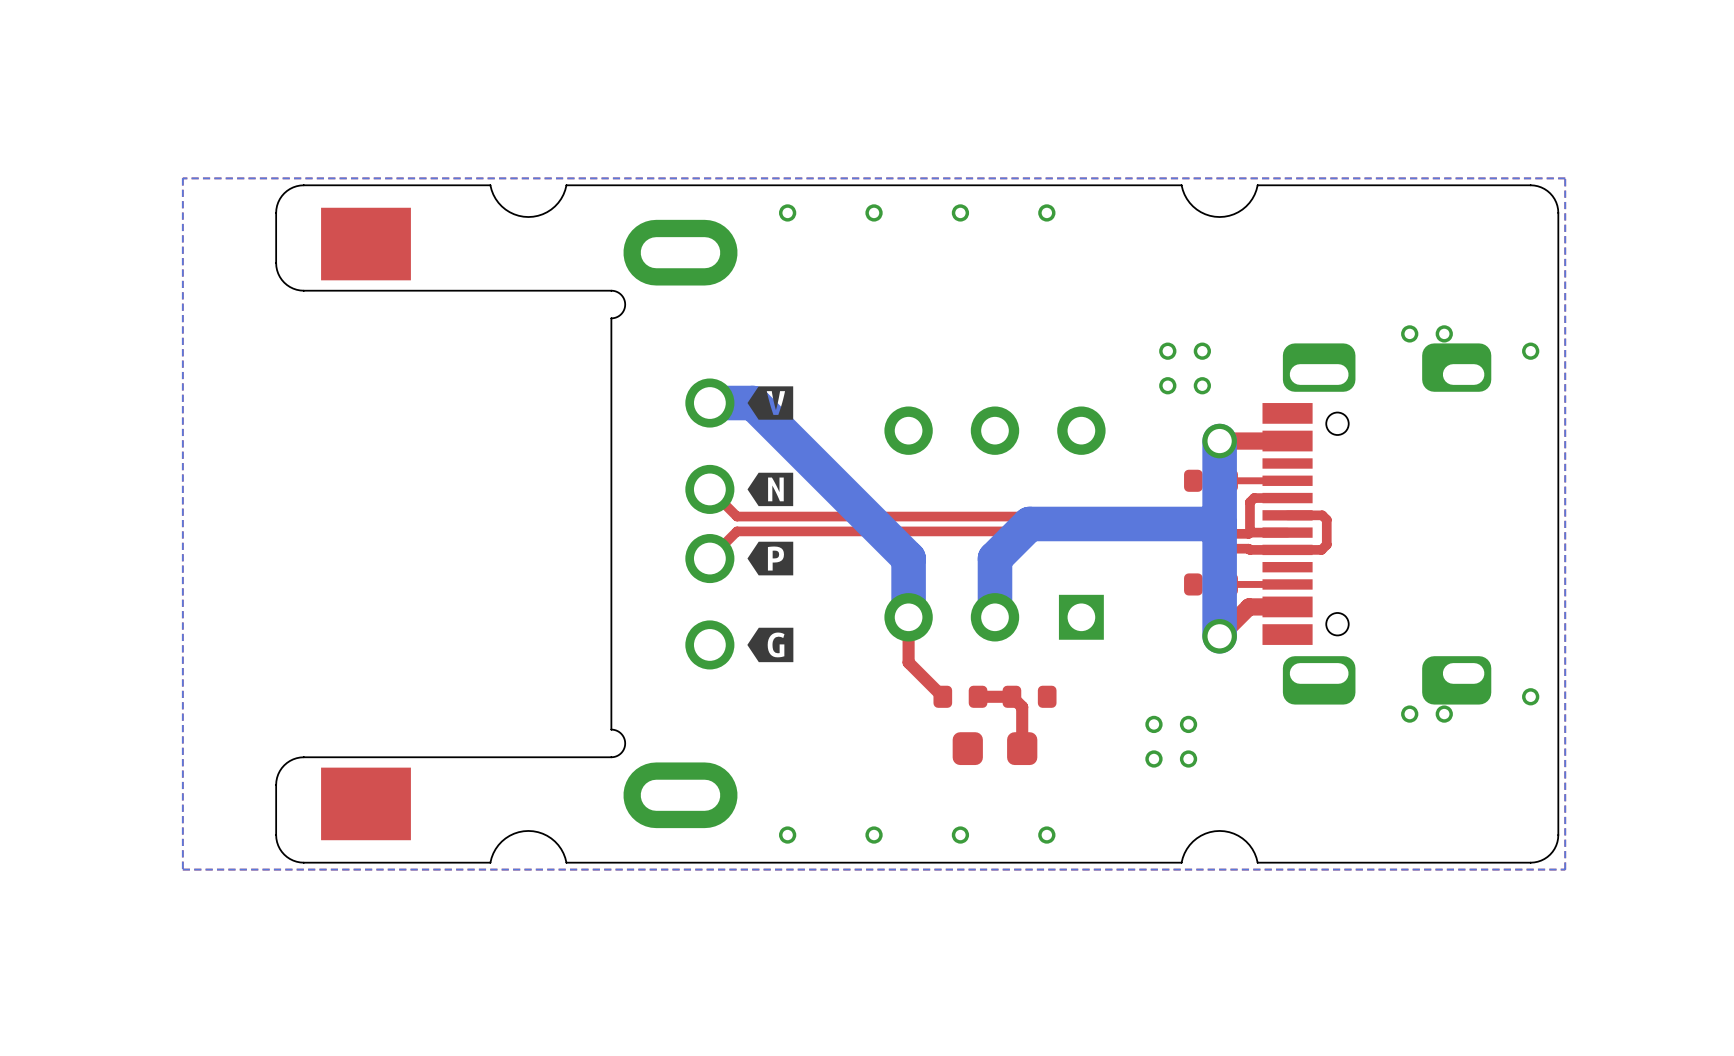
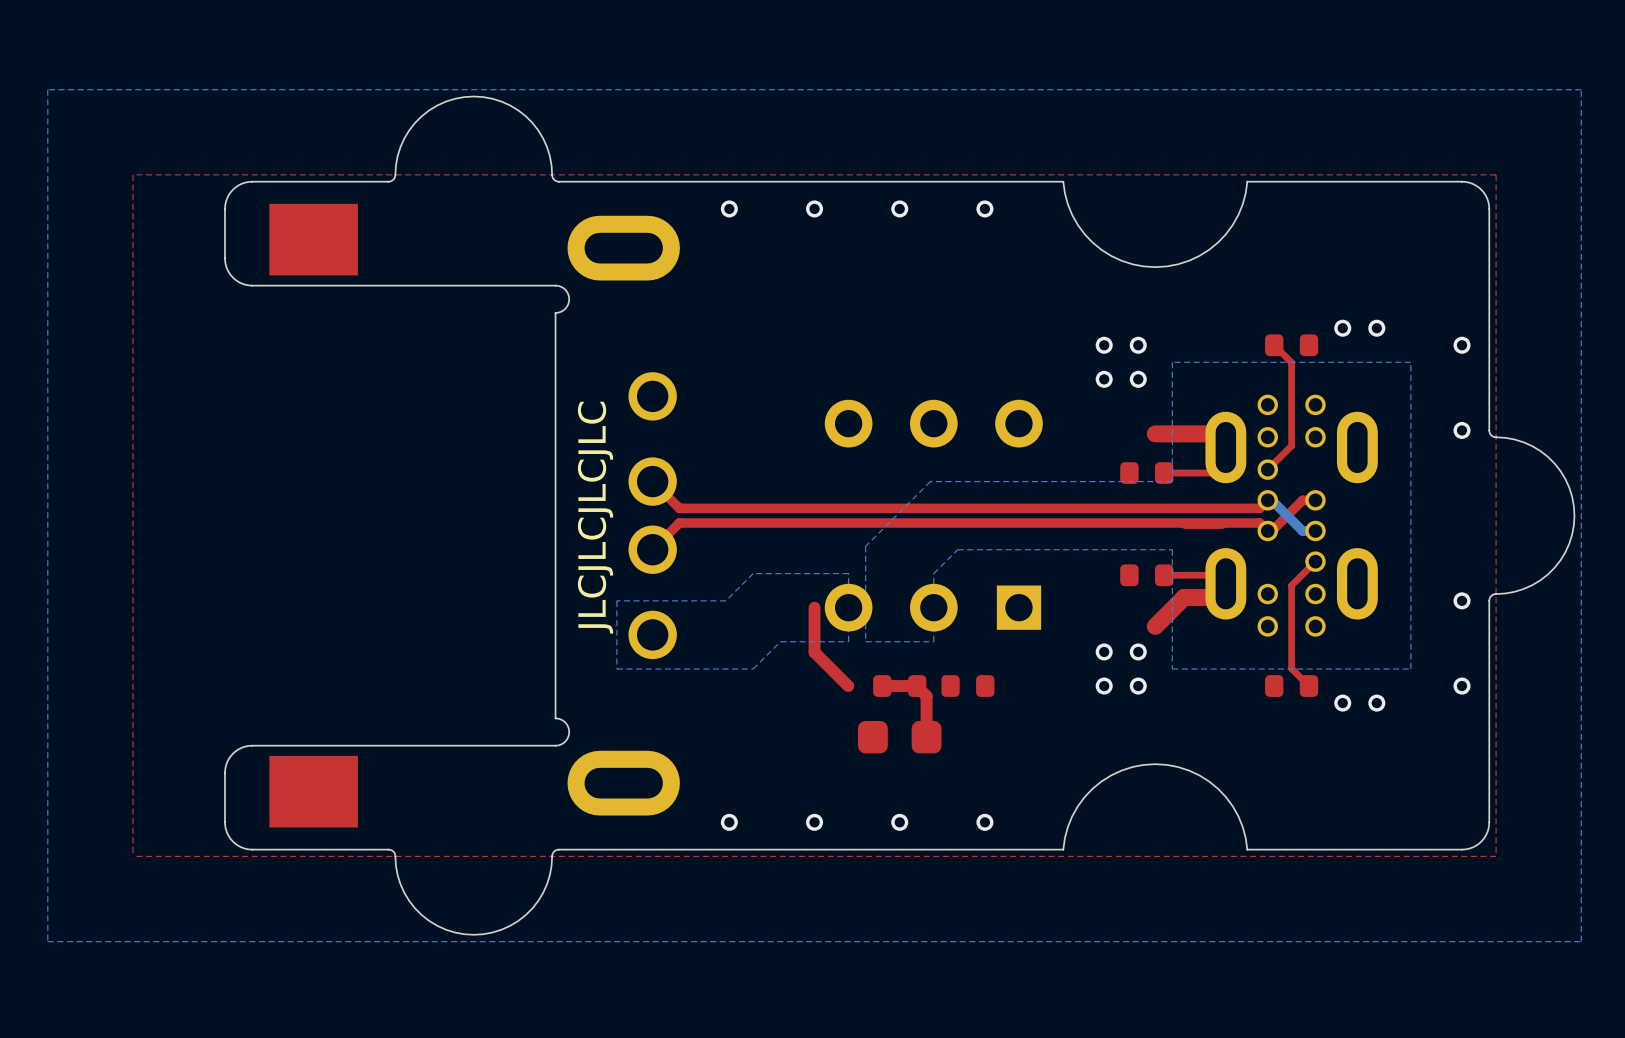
bottom zone outline: (1565, 178) (1565, 869) (182, 869) (182, 178) (1565, 178) -> (1581, 89) (1581, 941) (47, 941) (47, 89) (1581, 89)
board edge: (614, 185) (566, 185) (561, 198) (551, 209) (538, 215) (528, 217) (514, 214) (501, 206) (495, 198) (490, 185) (442, 185) -> (558, 181) (552, 177) (547, 147) (532, 122) (510, 105) (492, 98) (473, 96) (455, 98) (437, 105) (415, 122) (400, 147) (394, 177) (388, 181)
board edge: (1312, 185) (1257, 185) (1252, 198) (1242, 209) (1229, 215) (1219, 217) (1205, 214) (1193, 206) (1184, 194) (1181, 185) (1126, 185) -> (1247, 181) (1238, 214) (1218, 242) (1189, 260) (1155, 267) (1121, 260) (1092, 242) (1072, 214) (1063, 181)
part footprint: [1262, 343, 1492, 705] -> [1205, 394, 1378, 637]
top track: none -> (1274, 345) (1291, 362) (1291, 445) (1267, 469)
part: none -> (1291, 345)
bottom zone outline: none -> (1410, 362) (1410, 669) (1172, 669) (1172, 549) (957, 549) (933, 573) (933, 641) (865, 641) (865, 546) (930, 481) (1172, 481) (1172, 362) (1410, 362)
drawing: [747, 386, 794, 420] -> none
bottom track: (709, 403) (753, 403) (908, 558) (908, 617) -> none
via: none -> (1462, 430)
board edge: (1558, 437) (1558, 610) -> (1489, 430) (1493, 436) (1514, 439) (1532, 446) (1554, 463) (1569, 487) (1574, 515) (1569, 543) (1554, 567) (1532, 585) (1514, 591) (1493, 594) (1489, 600)
bottom track: (1219, 441) (1219, 636) -> none
via: (1219, 441) -> none
drawing: [747, 472, 794, 576] -> none
top track: (1287, 498) (1254, 498) (1249, 502) (1248, 533) (1222, 533) (1205, 516) -> (1267, 500) (1259, 508) (1141, 508)
bottom track: none -> (1267, 500) (1271, 500) (1302, 530) (1315, 530)
top track: (1287, 515) (1322, 515) (1326, 519) (1326, 544) (1321, 549) (1216, 548) (1199, 531) -> (1315, 500) (1302, 500) (1271, 530) (1267, 530) (1259, 522) (1135, 522)
bottom track: (1219, 523) (1029, 523) (994, 558) (994, 617) -> none
text: none -> JLCJLCJLCJLC (595, 517)
top track: none -> (1315, 561) (1291, 585) (1291, 668) (1309, 686)
bottom zone outline: none -> (848, 573) (848, 641) (780, 641) (753, 669) (616, 669) (616, 600) (725, 600) (753, 573) (848, 573)
via: none -> (1462, 600)
top track: none -> (814, 607) (814, 652) (848, 686)
top track: (908, 617) (908, 662) (942, 696) -> (926, 737) (926, 696) (916, 686) (883, 686)
via size: [1202, 619, 1237, 654] -> [1129, 643, 1147, 661]
drawing: [747, 627, 794, 663] -> none
via: none -> (1104, 651)
top track: (978, 696) (1011, 696) (1022, 707) (1022, 748) -> none
via: none -> (1104, 686)
via: none -> (1138, 686)
part: none -> (1291, 686)
via: (1153, 724) -> none
via: (1188, 724) -> none
part position: (994, 748) -> (899, 737)
via: (1153, 758) -> none
via: (1188, 758) -> none
board edge: (614, 862) (566, 862) (561, 849) (551, 838) (542, 833) (528, 830) (514, 833) (505, 838) (495, 849) (490, 862) (442, 862) -> (558, 849) (552, 853) (549, 875) (543, 892) (525, 915) (501, 929) (473, 934) (455, 932) (437, 925) (415, 908) (400, 884) (394, 853) (388, 849)
board edge: (1312, 862) (1257, 862) (1252, 849) (1242, 838) (1229, 832) (1219, 830) (1209, 832) (1196, 838) (1186, 849) (1181, 862) (1126, 862) -> (1247, 849) (1238, 816) (1218, 788) (1189, 770) (1155, 764) (1121, 770) (1092, 788) (1072, 816) (1063, 849)

